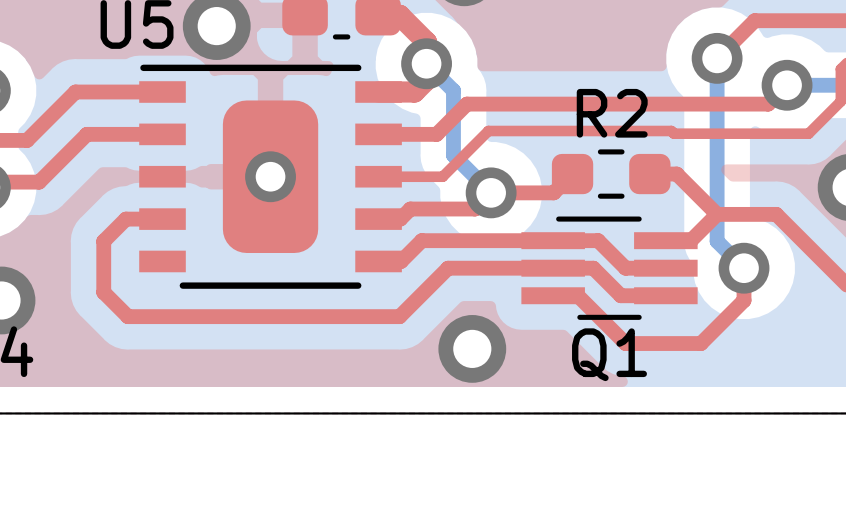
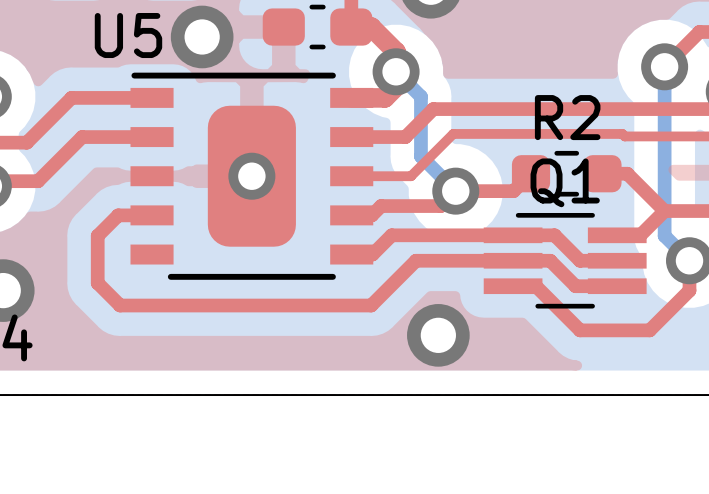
Q1 name position: Q1 (609, 354) -> Q1 (565, 182)

